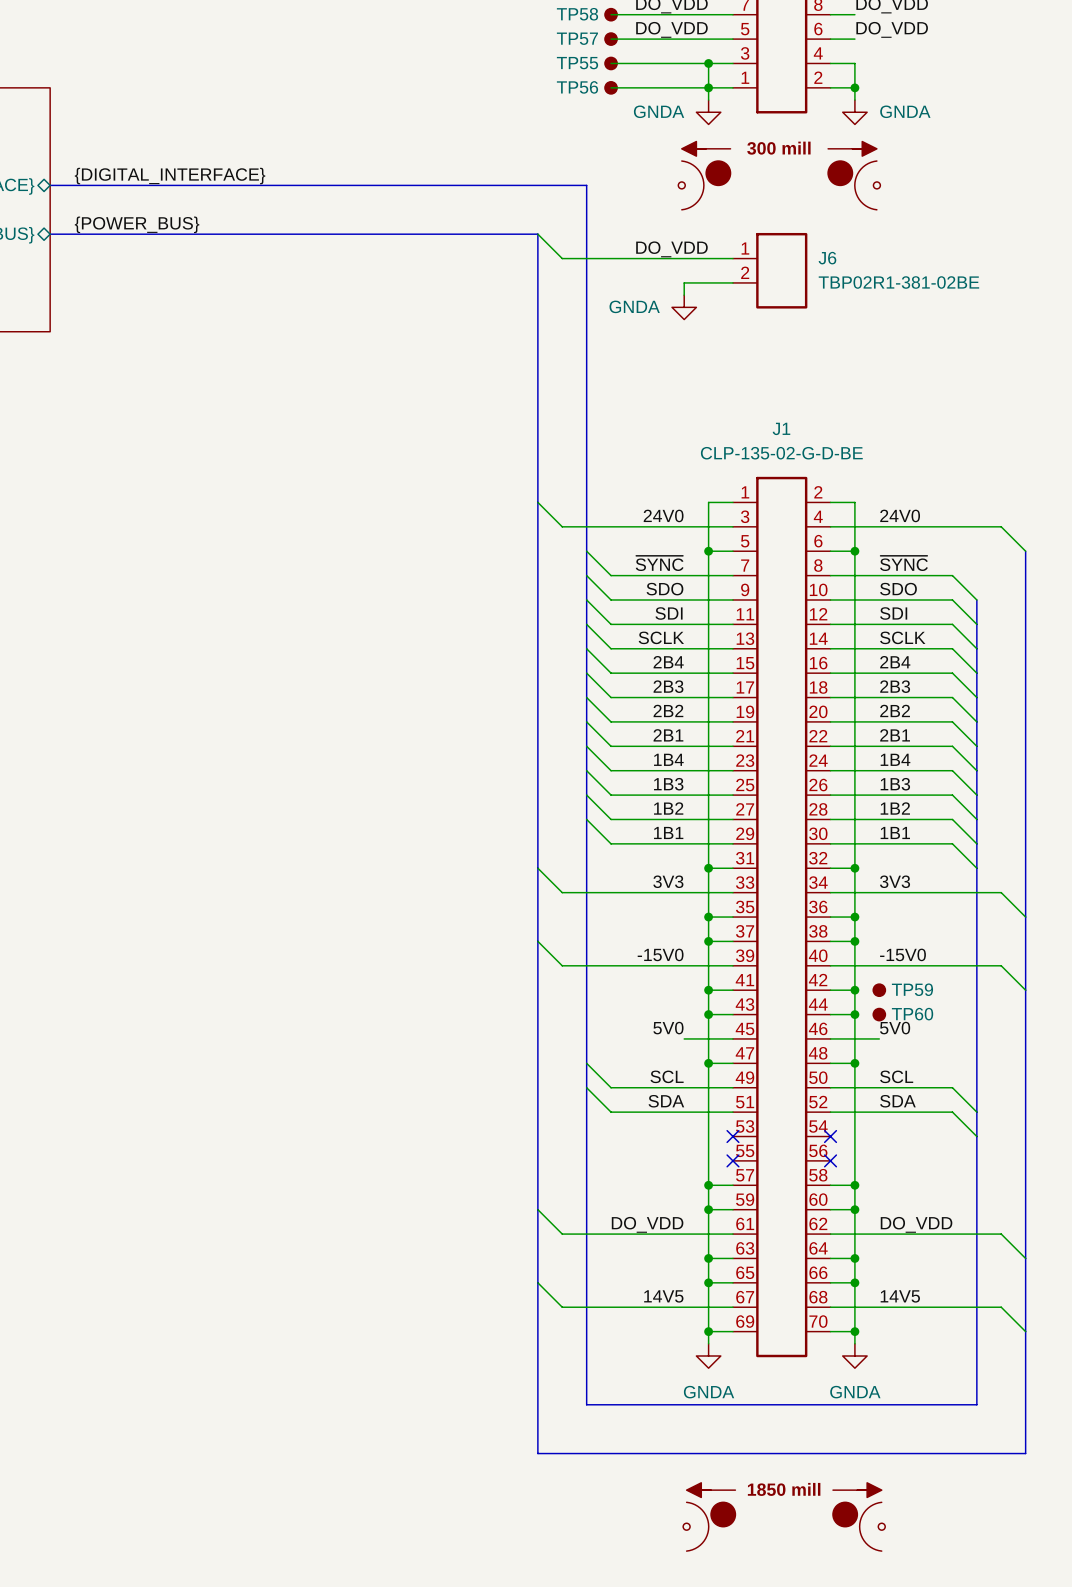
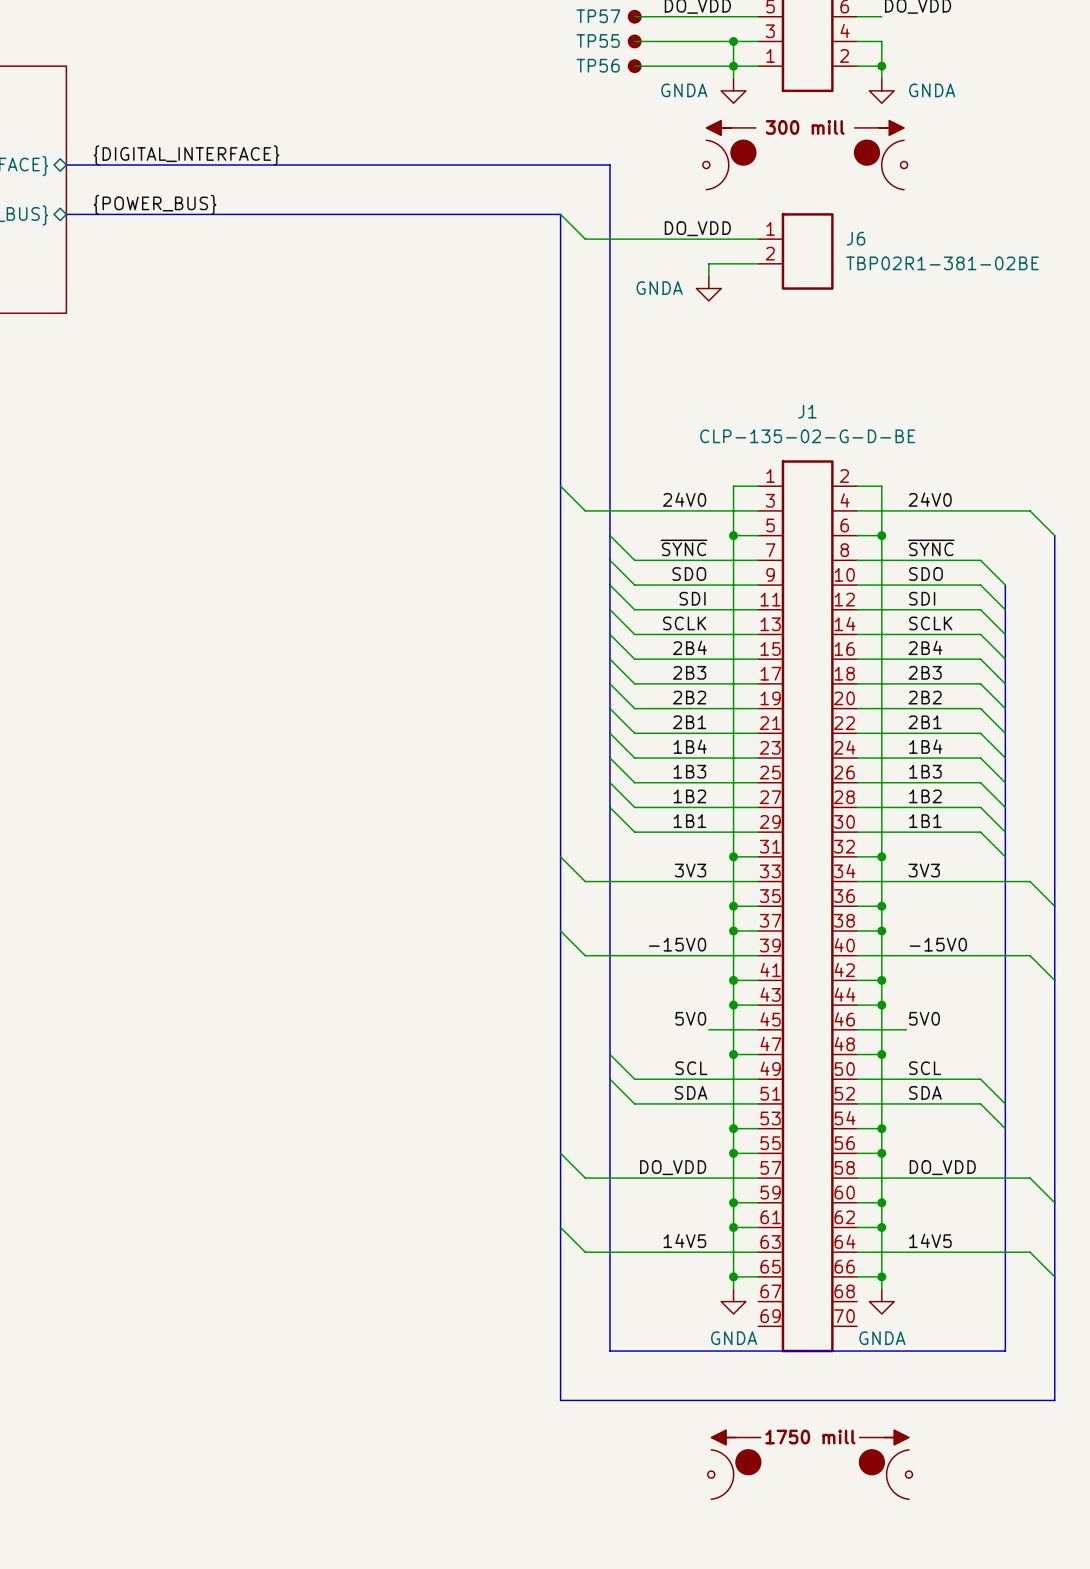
TP59: (879, 990) -> none
TP60: (879, 1014) -> none
wire: none -> (733, 1128) (758, 1128)
junction: none -> (733, 1128)
no-connect mark: (732, 1136) -> none
wire: none -> (857, 1128) (881, 1128)
no-connect mark: (830, 1136) -> none
junction: none -> (881, 1128)
wire: none -> (560, 1153) (585, 1178) (733, 1178)
junction: none -> (733, 1153)
no-connect mark: (732, 1160) -> none
no-connect mark: (830, 1160) -> none
junction: none -> (881, 1153)
junction: (708, 1185) -> none
wire: none -> (881, 1178) (1030, 1178) (1054, 1202)
junction: (854, 1185) -> none
wire: (537, 1209) (562, 1234) (708, 1234) -> (560, 1227) (585, 1252) (733, 1252)
label position: DO_VDD (647, 1224) -> DO_VDD (673, 1167)
label position: DO_VDD (916, 1224) -> DO_VDD (942, 1167)
junction: none -> (733, 1227)
wire: (854, 1234) (1001, 1234) (1025, 1258) -> (881, 1252) (1030, 1252) (1054, 1276)
junction: none -> (881, 1227)
junction: (708, 1258) -> none
junction: (854, 1258) -> none
wire: (537, 1282) (562, 1307) (732, 1307) -> none
wire: (708, 1295) (708, 1343) -> none
wire: (854, 1295) (854, 1343) -> none
label position: 14V5 (663, 1296) -> 14V5 (684, 1240)
label position: 14V5 (900, 1296) -> 14V5 (930, 1240)
wire: (830, 1307) (1001, 1307) (1025, 1331) -> none
wire: (708, 1331) (732, 1331) -> (733, 1153) (758, 1153)
junction: (708, 1331) -> none
wire: (830, 1331) (854, 1331) -> (857, 1153) (881, 1153)
junction: (854, 1331) -> none
bus: (586, 1356) (586, 1404) -> (560, 1400) (609, 1400)
bus: none -> (609, 1351) (1005, 1351)
power symbol position: GNDA (708, 1356) -> GNDA (733, 1301)
power symbol position: GNDA (854, 1356) -> GNDA (881, 1301)
bus: (976, 1356) (976, 1404) -> (1054, 1400) (1005, 1400)
bus: (537, 1404) (537, 1453) (1025, 1453) (1025, 1404) -> none
part: none -> (810, 1464)
part: (784, 1516) -> none

